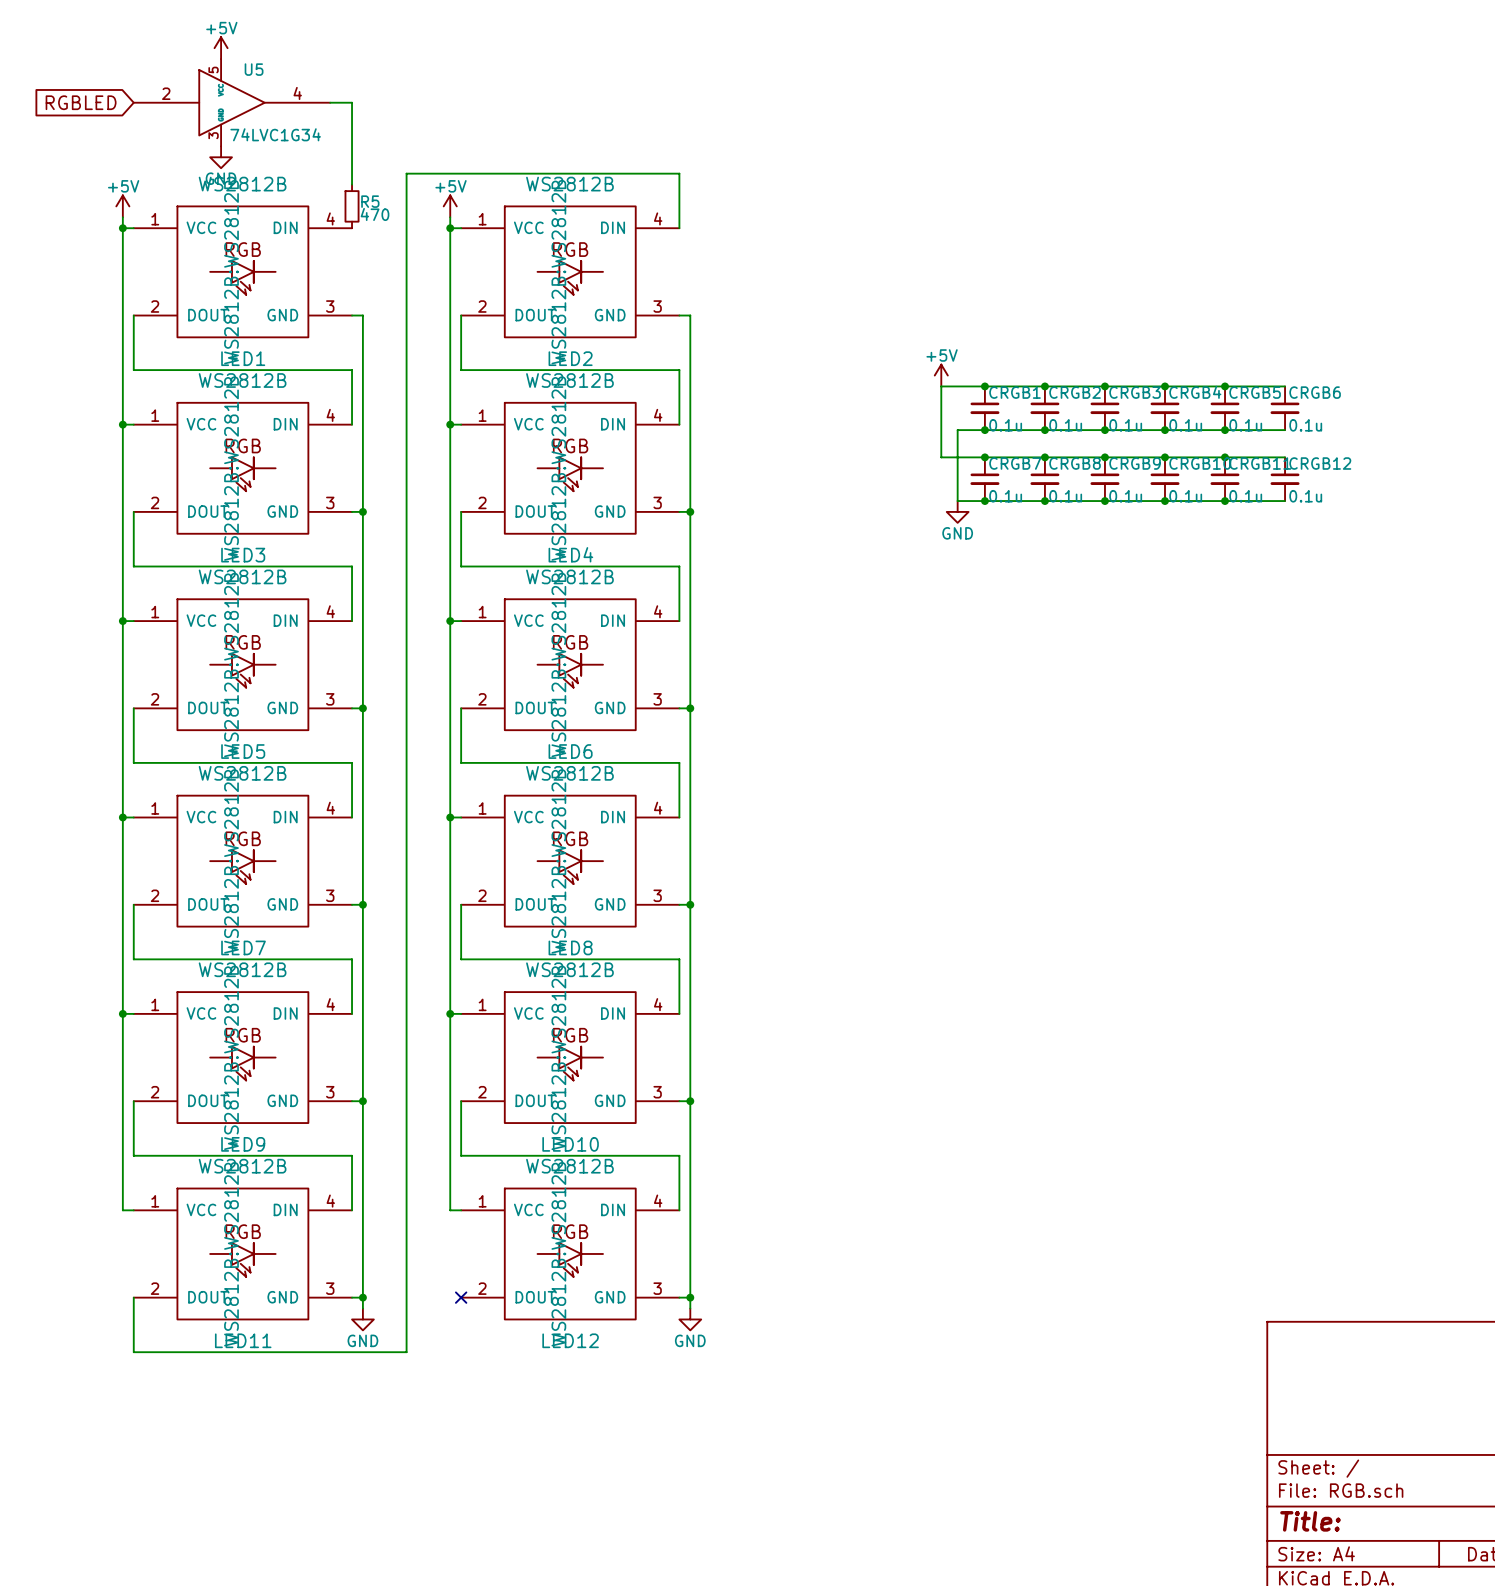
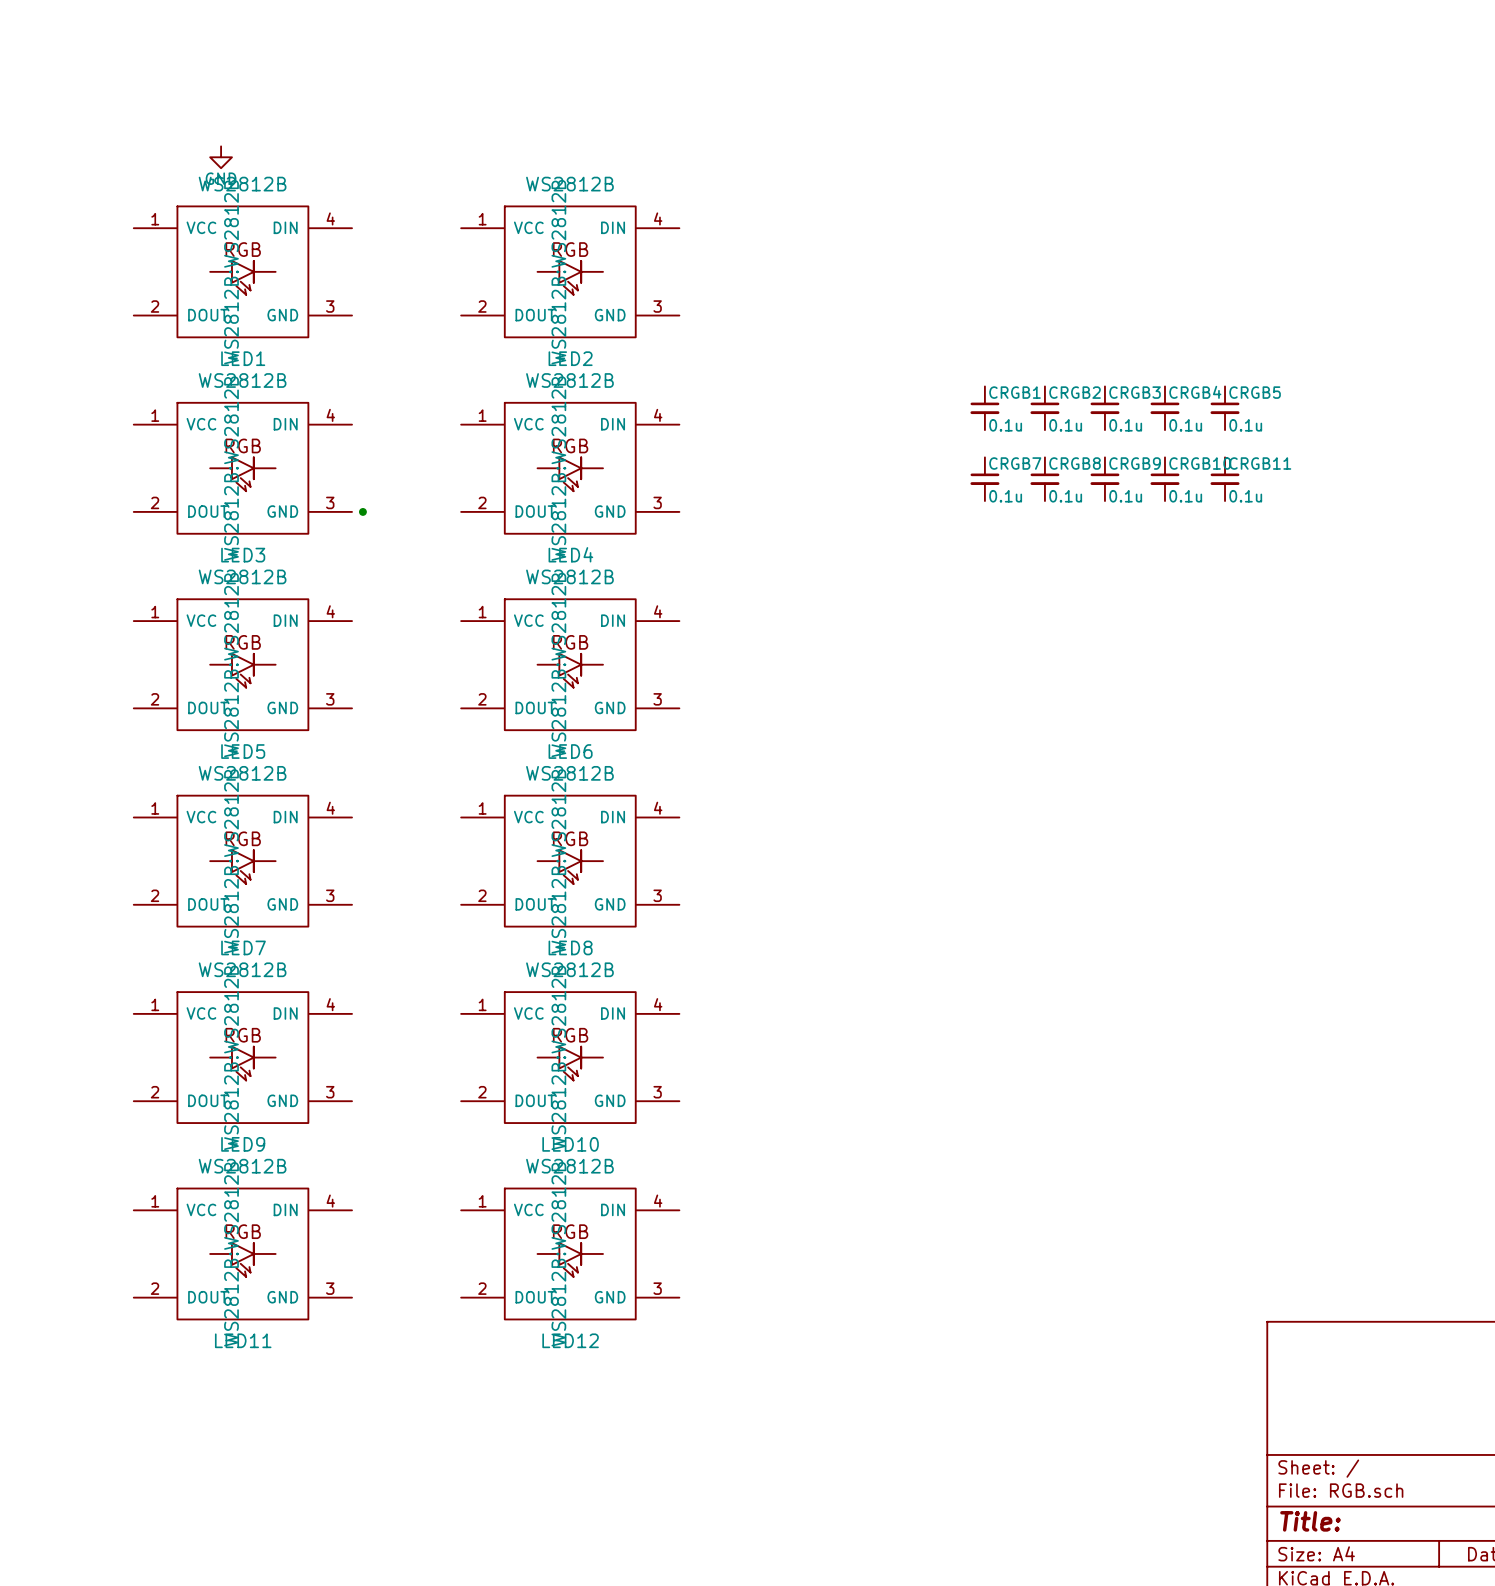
power symbol: +5V (221, 48) -> none
global label: RGBLED (81, 102) -> none
U5: 74LVC1G34 (231, 102) -> none
wire: (330, 102) (352, 102) (352, 184) -> none
power symbol: +5V (122, 206) -> none
R5: 470 (352, 206) -> none
power symbol: +5V (450, 206) -> none
wire: (122, 217) (122, 1210) (133, 1210) -> none
wire: (450, 217) (450, 1210) (461, 1210) -> none
wire: (122, 228) (133, 228) -> none
junction: (122, 228) -> none
wire: (450, 228) (461, 228) -> none
junction: (450, 228) -> none
wire: (679, 228) (679, 173) (406, 173) (406, 1352) (133, 1352) (133, 1297) -> none
wire: (133, 315) (133, 370) (352, 370) (352, 424) -> none
wire: (352, 315) (362, 315) (362, 1308) -> none
wire: (461, 315) (461, 370) (679, 370) (679, 424) -> none
wire: (679, 315) (690, 315) (690, 1308) -> none
power symbol: +5V (941, 375) -> none
junction: (984, 386) -> none
junction: (1044, 386) -> none
junction: (1104, 386) -> none
junction: (1164, 386) -> none
junction: (1225, 386) -> none
wire: (1285, 386) (941, 386) (941, 457) (1285, 457) -> none
CRGB6: 0.1u (1285, 408) -> none
wire: (122, 424) (133, 424) -> none
junction: (122, 424) -> none
wire: (450, 424) (461, 424) -> none
junction: (450, 424) -> none
junction: (984, 430) -> none
junction: (1044, 430) -> none
junction: (1104, 430) -> none
junction: (1164, 430) -> none
junction: (1225, 430) -> none
wire: (1285, 430) (957, 430) (957, 501) (1285, 501) -> none
junction: (984, 457) -> none
junction: (1044, 457) -> none
junction: (1104, 457) -> none
junction: (1164, 457) -> none
junction: (1225, 457) -> none
CRGB12: 0.1u (1285, 479) -> none
junction: (984, 501) -> none
junction: (1044, 501) -> none
junction: (1104, 501) -> none
junction: (1164, 501) -> none
junction: (1225, 501) -> none
wire: (133, 511) (133, 566) (352, 566) (352, 621) -> none
wire: (352, 511) (362, 511) -> none
wire: (461, 511) (461, 566) (679, 566) (679, 621) -> none
wire: (679, 511) (690, 511) -> none
junction: (690, 511) -> none
power symbol: GND (957, 511) -> none
wire: (122, 621) (133, 621) -> none
junction: (122, 621) -> none
wire: (450, 621) (461, 621) -> none
junction: (450, 621) -> none
wire: (133, 708) (133, 762) (352, 762) (352, 817) -> none
wire: (352, 708) (362, 708) -> none
junction: (362, 708) -> none
wire: (461, 708) (461, 762) (679, 762) (679, 817) -> none
wire: (679, 708) (690, 708) -> none
junction: (690, 708) -> none
wire: (122, 817) (133, 817) -> none
junction: (122, 817) -> none
wire: (450, 817) (461, 817) -> none
junction: (450, 817) -> none
wire: (133, 904) (133, 959) (352, 959) (352, 1013) -> none
wire: (352, 904) (362, 904) -> none
junction: (362, 904) -> none
wire: (461, 904) (461, 959) (679, 959) (679, 1013) -> none
wire: (679, 904) (690, 904) -> none
junction: (690, 904) -> none
wire: (122, 1013) (133, 1013) -> none
junction: (122, 1013) -> none
wire: (450, 1013) (461, 1013) -> none
junction: (450, 1013) -> none
wire: (133, 1101) (133, 1155) (352, 1155) (352, 1210) -> none
wire: (352, 1101) (362, 1101) -> none
junction: (362, 1101) -> none
wire: (461, 1101) (461, 1155) (679, 1155) (679, 1210) -> none
wire: (679, 1101) (690, 1101) -> none
junction: (690, 1101) -> none
wire: (352, 1297) (362, 1297) -> none
junction: (362, 1297) -> none
no-connect mark: (461, 1297) -> none
wire: (679, 1297) (690, 1297) -> none
junction: (690, 1297) -> none
power symbol: GND (362, 1319) -> none
power symbol: GND (690, 1319) -> none

